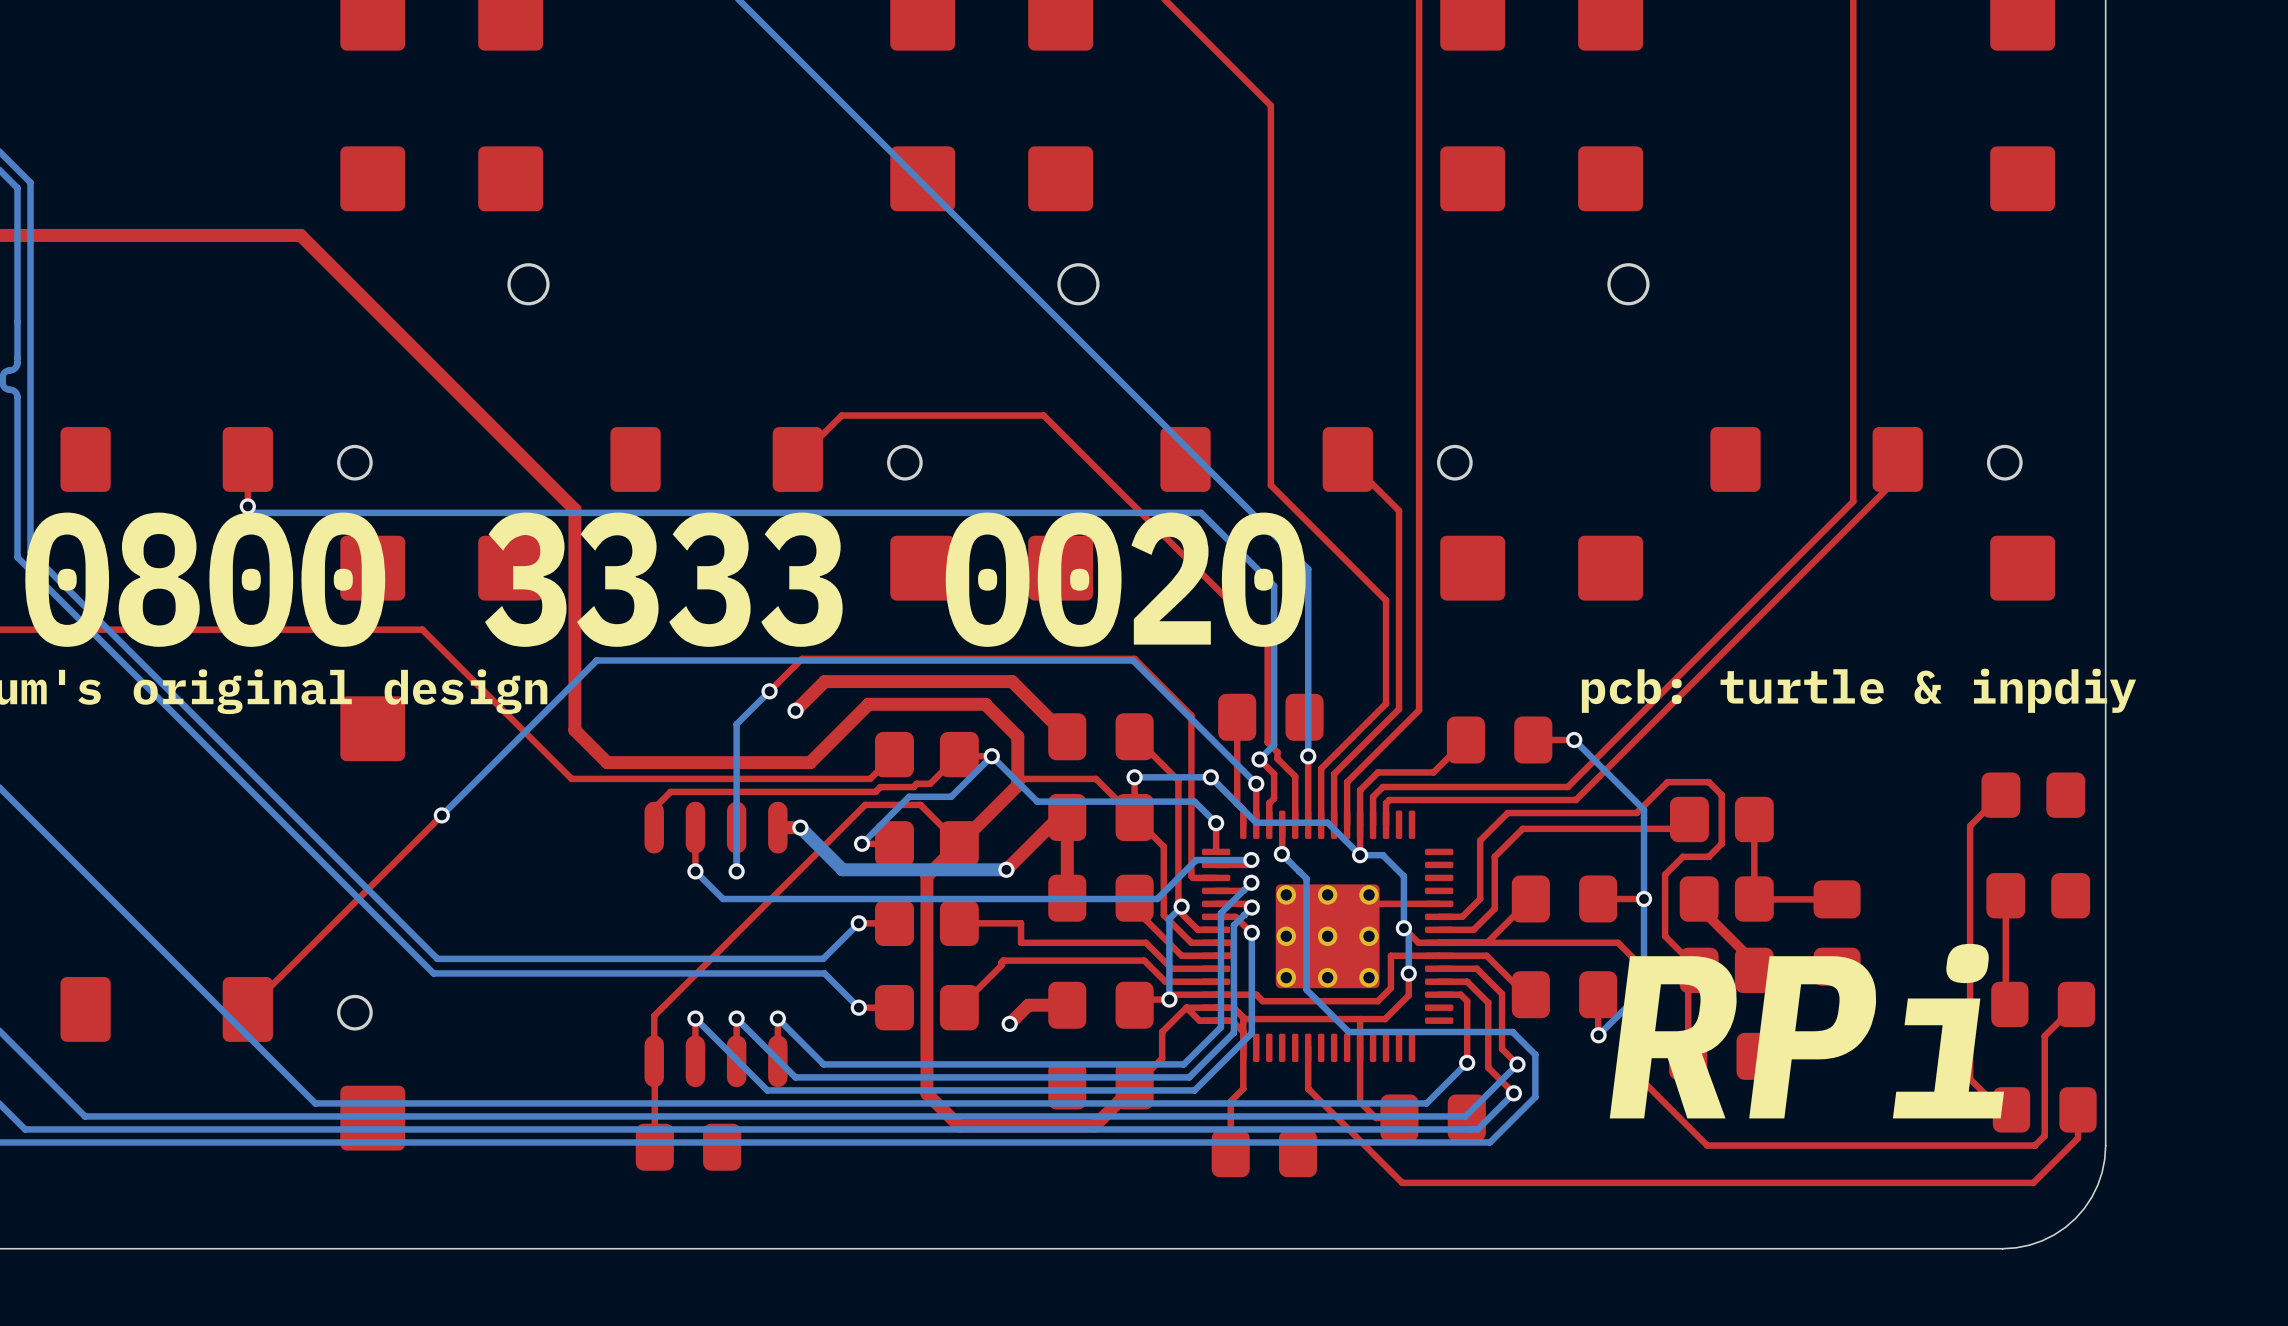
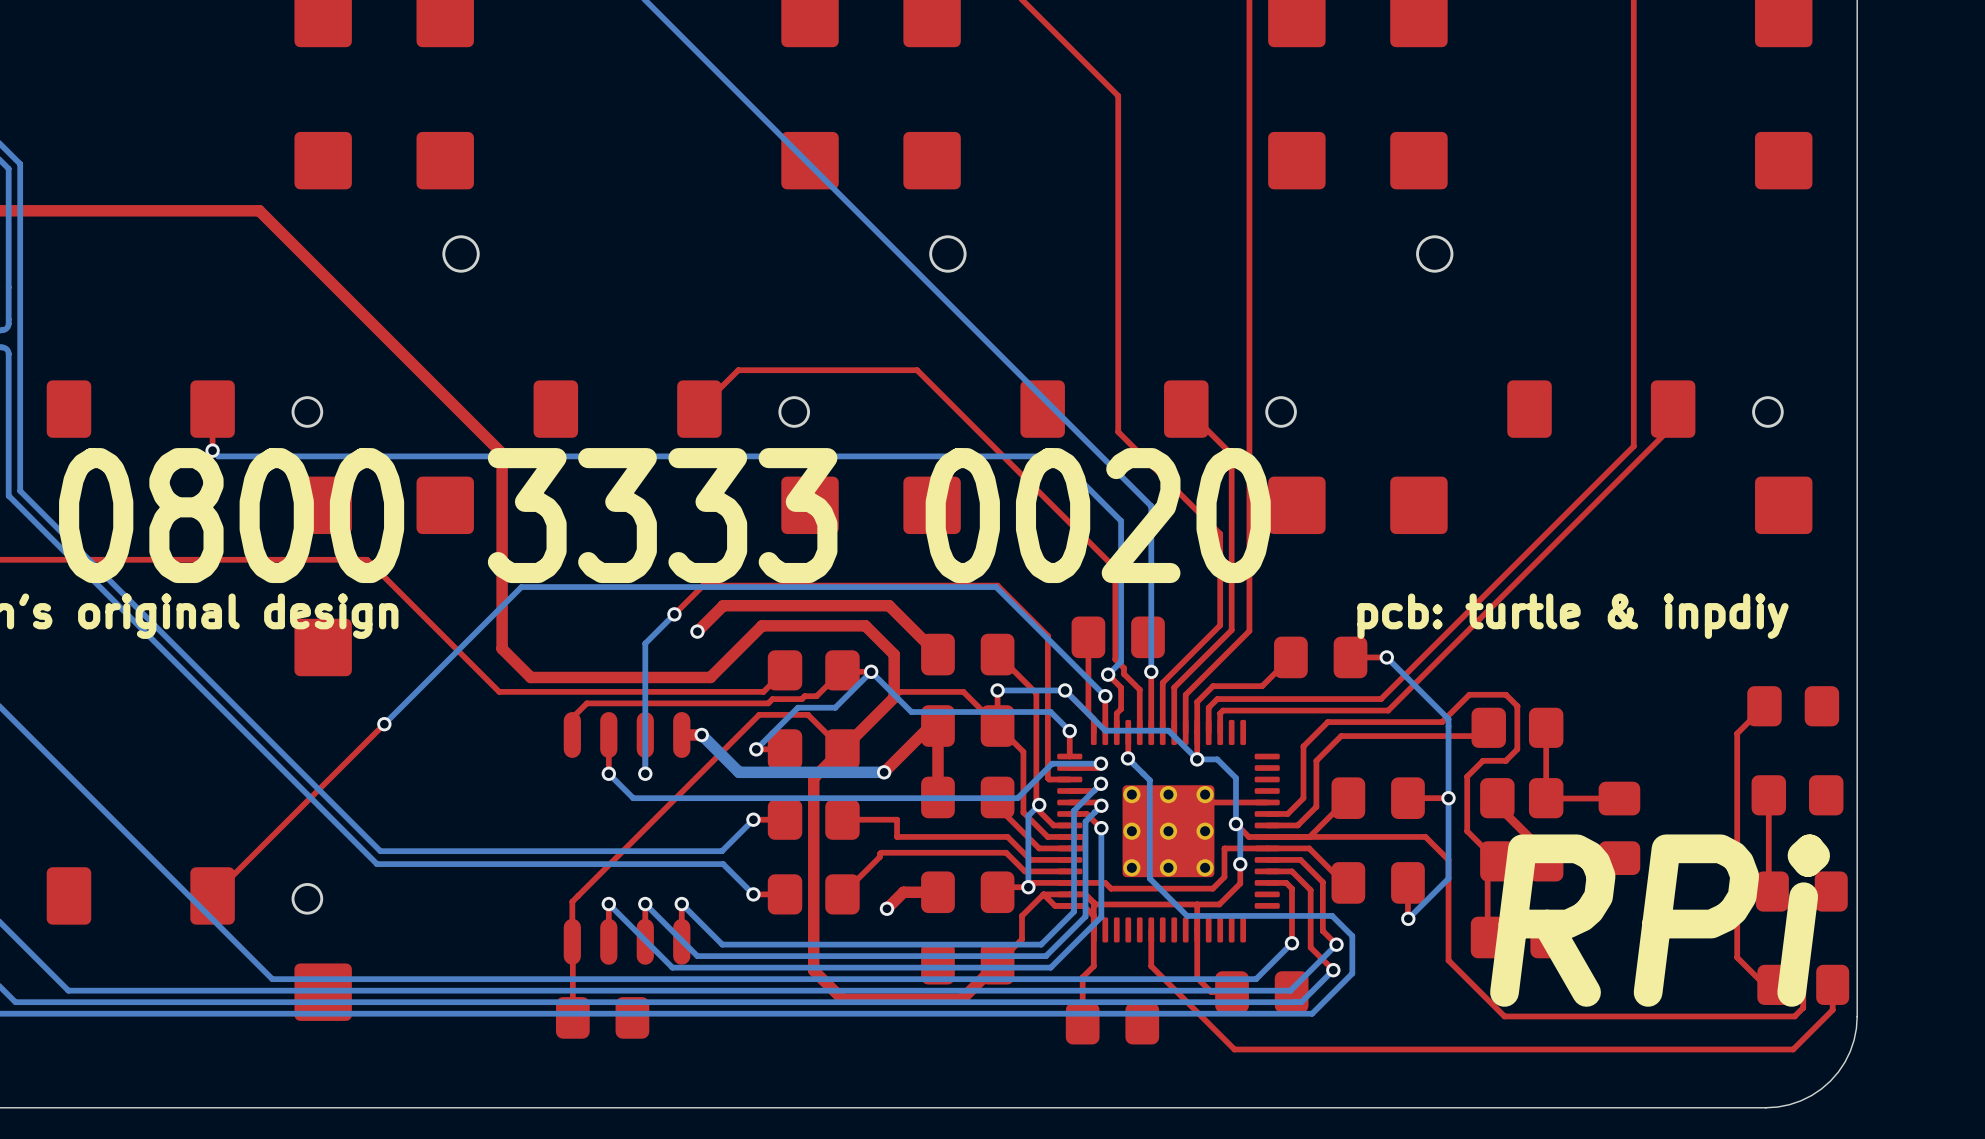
text position: pcb: turtle & inpdiy (1858, 690) -> pcb: turtle & inpdiy (1573, 616)
text position: RPi (1806, 1031) -> RPi (1660, 920)

